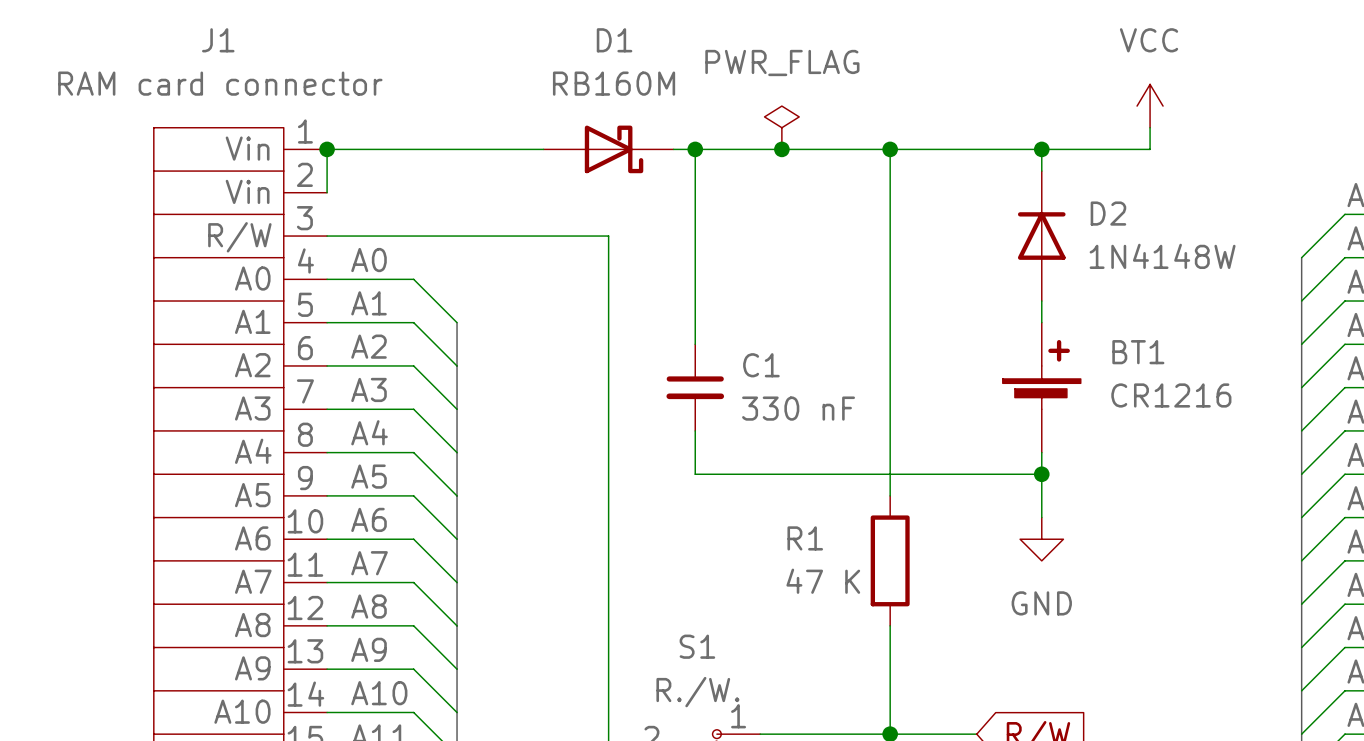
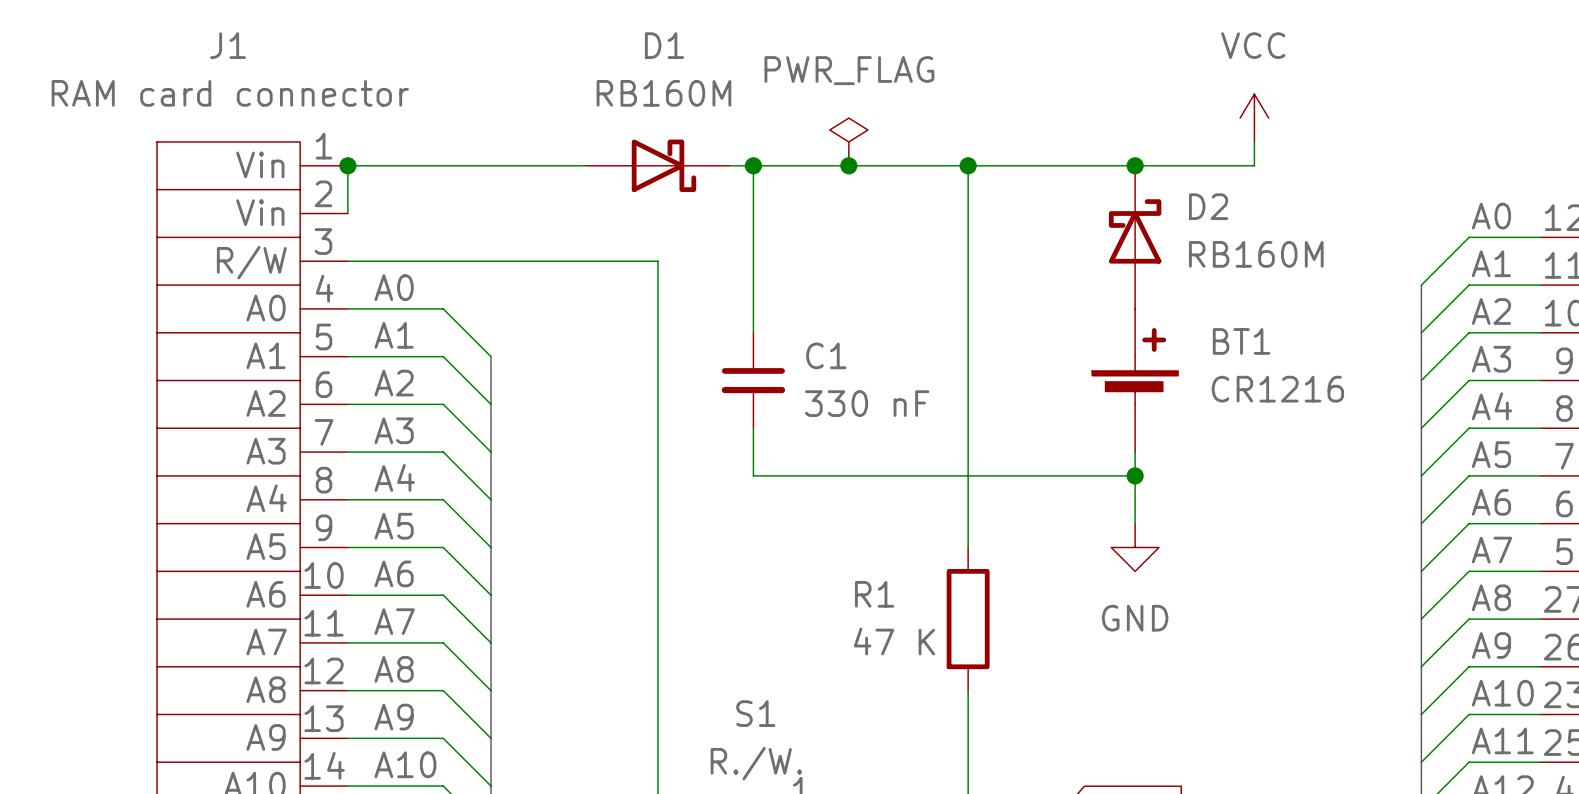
D2 symbol: [1017, 171, 1066, 302] -> [1108, 165, 1162, 309]
D2 value: 1N4148W (1162, 256) -> RB160M (1256, 254)
wire: none -> (753, 428) (753, 475) (1135, 475)
C1 position: (695, 387) -> (753, 380)
BT1 position: (1041, 387) -> (1135, 380)
wire: (695, 430) (695, 474) (1041, 474) (1041, 517) -> none
junction position: (1041, 474) -> (1135, 475)
power symbol position: GND (1041, 539) -> GND (1135, 547)

